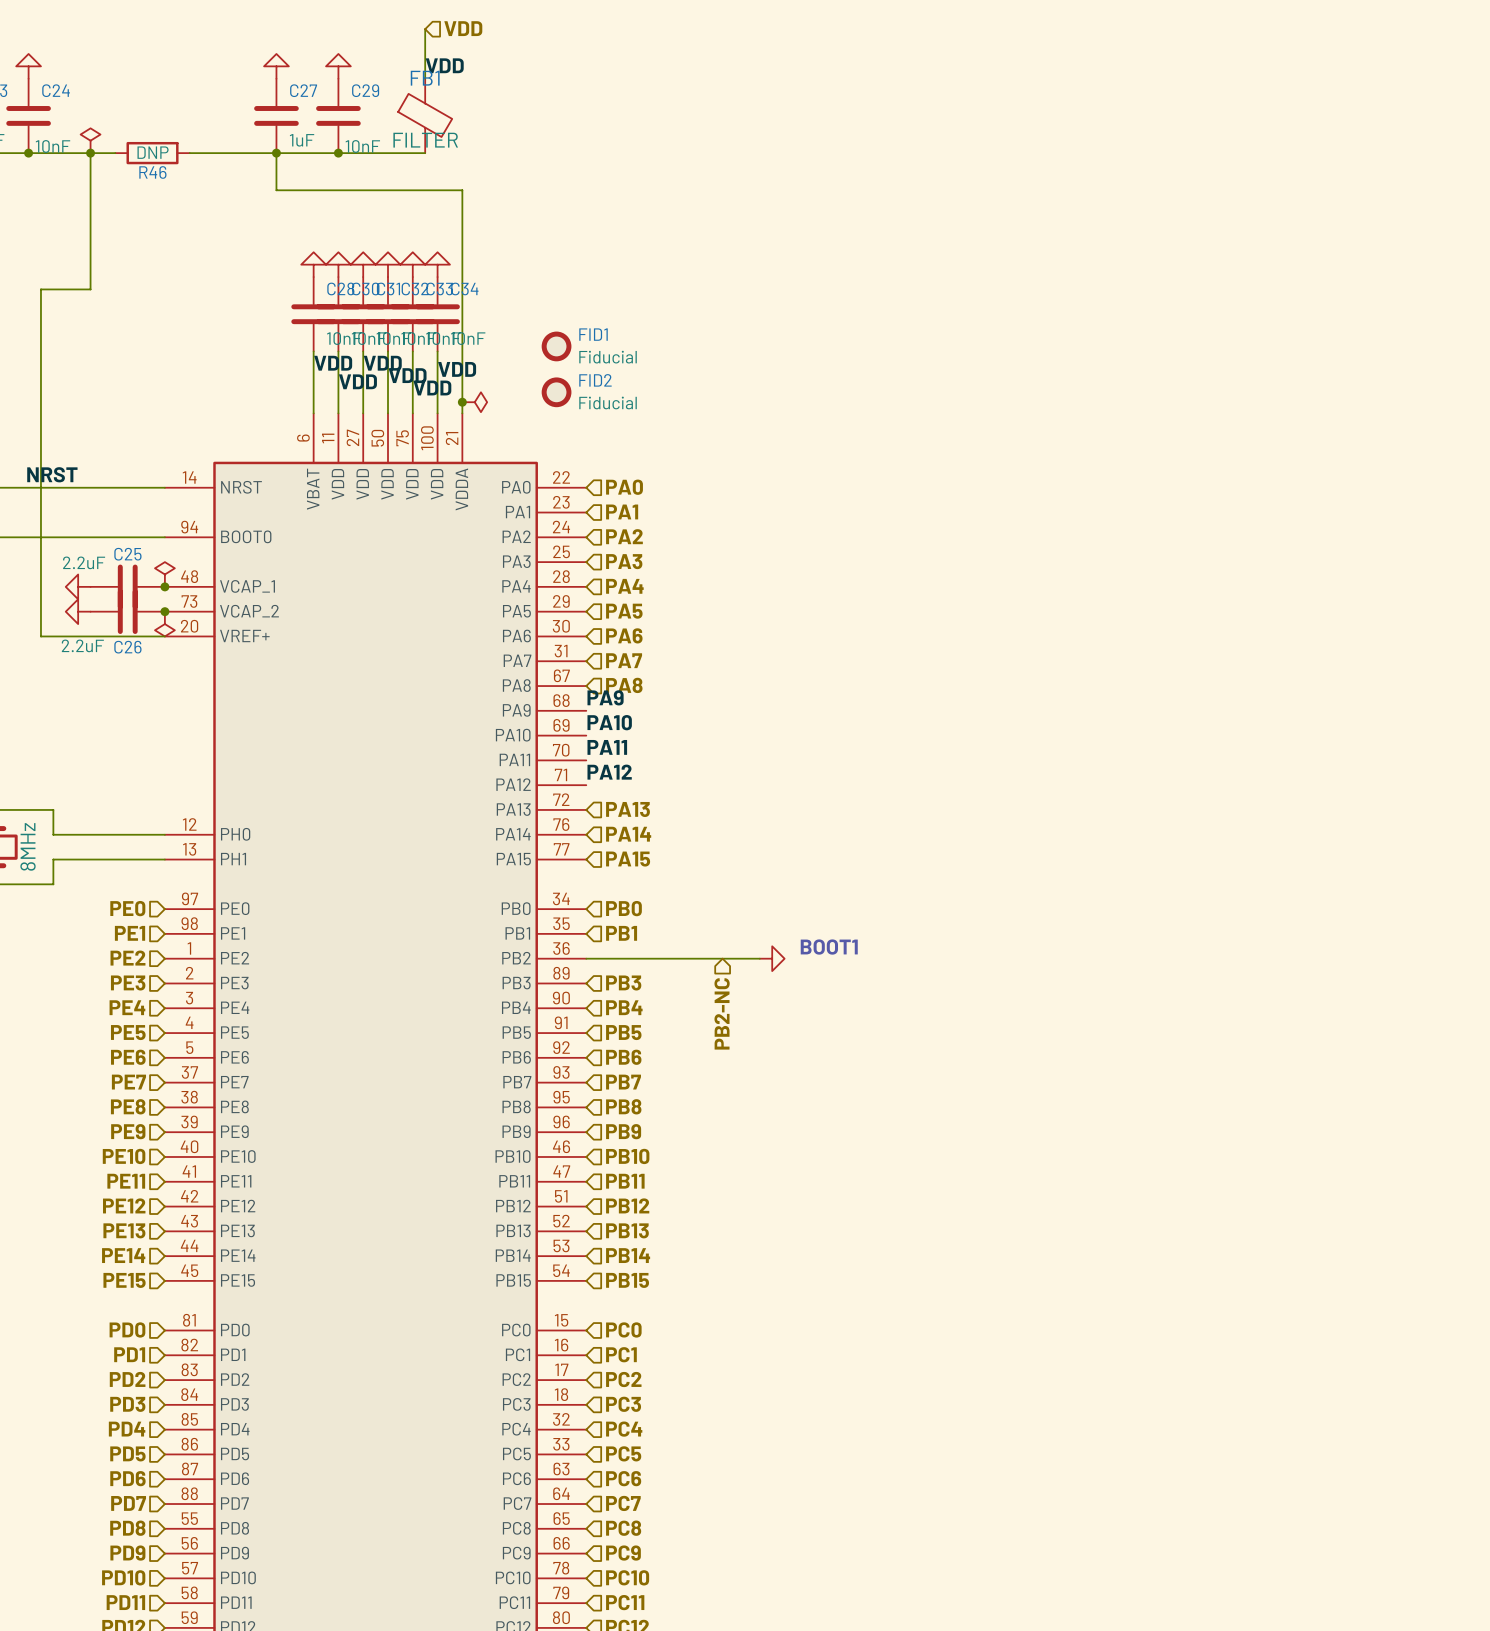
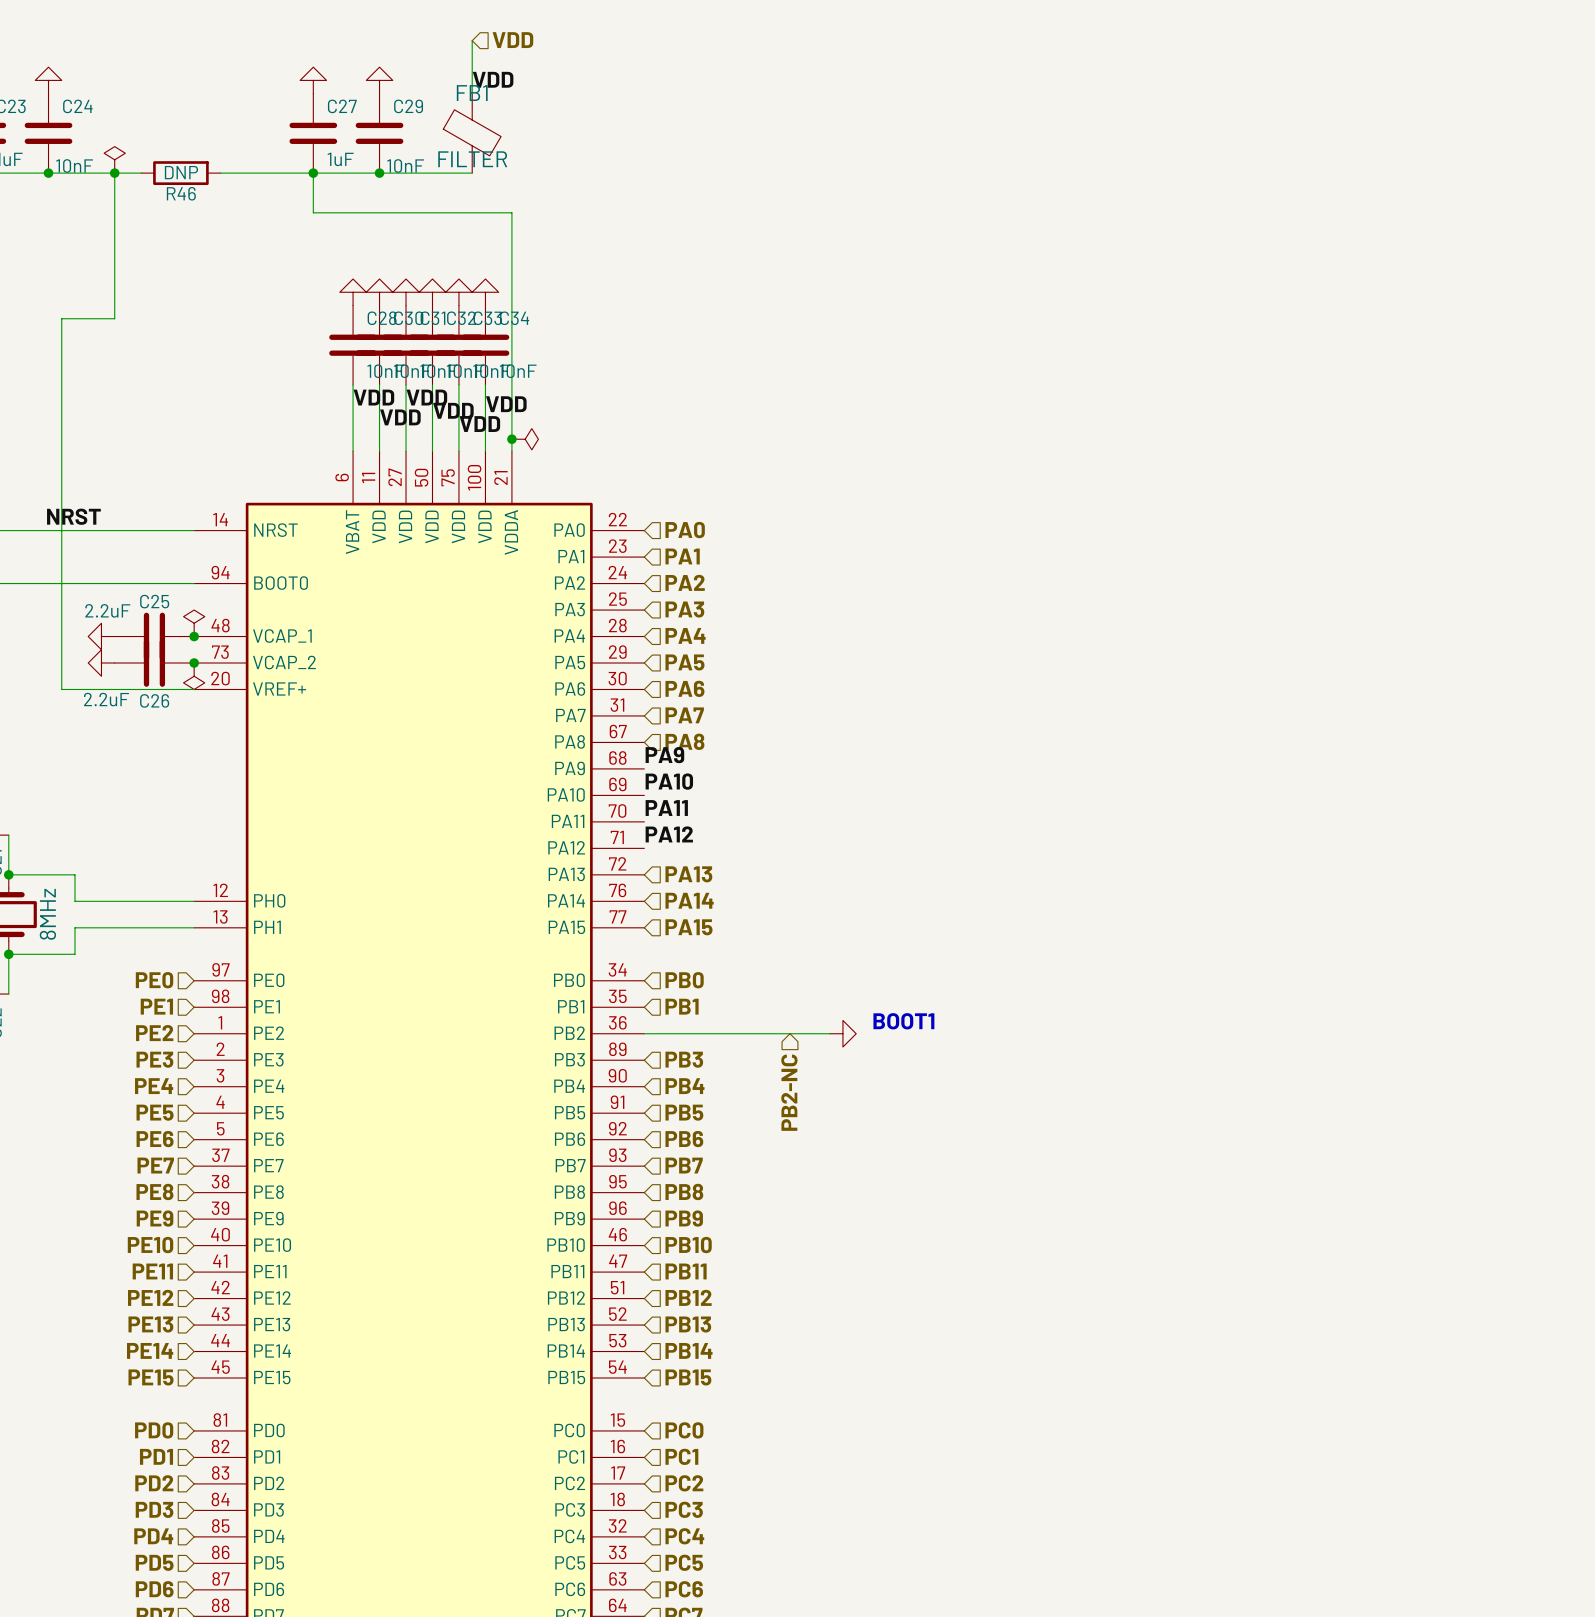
FID1: Fiducial (556, 346) -> none
FID2: Fiducial (556, 392) -> none

